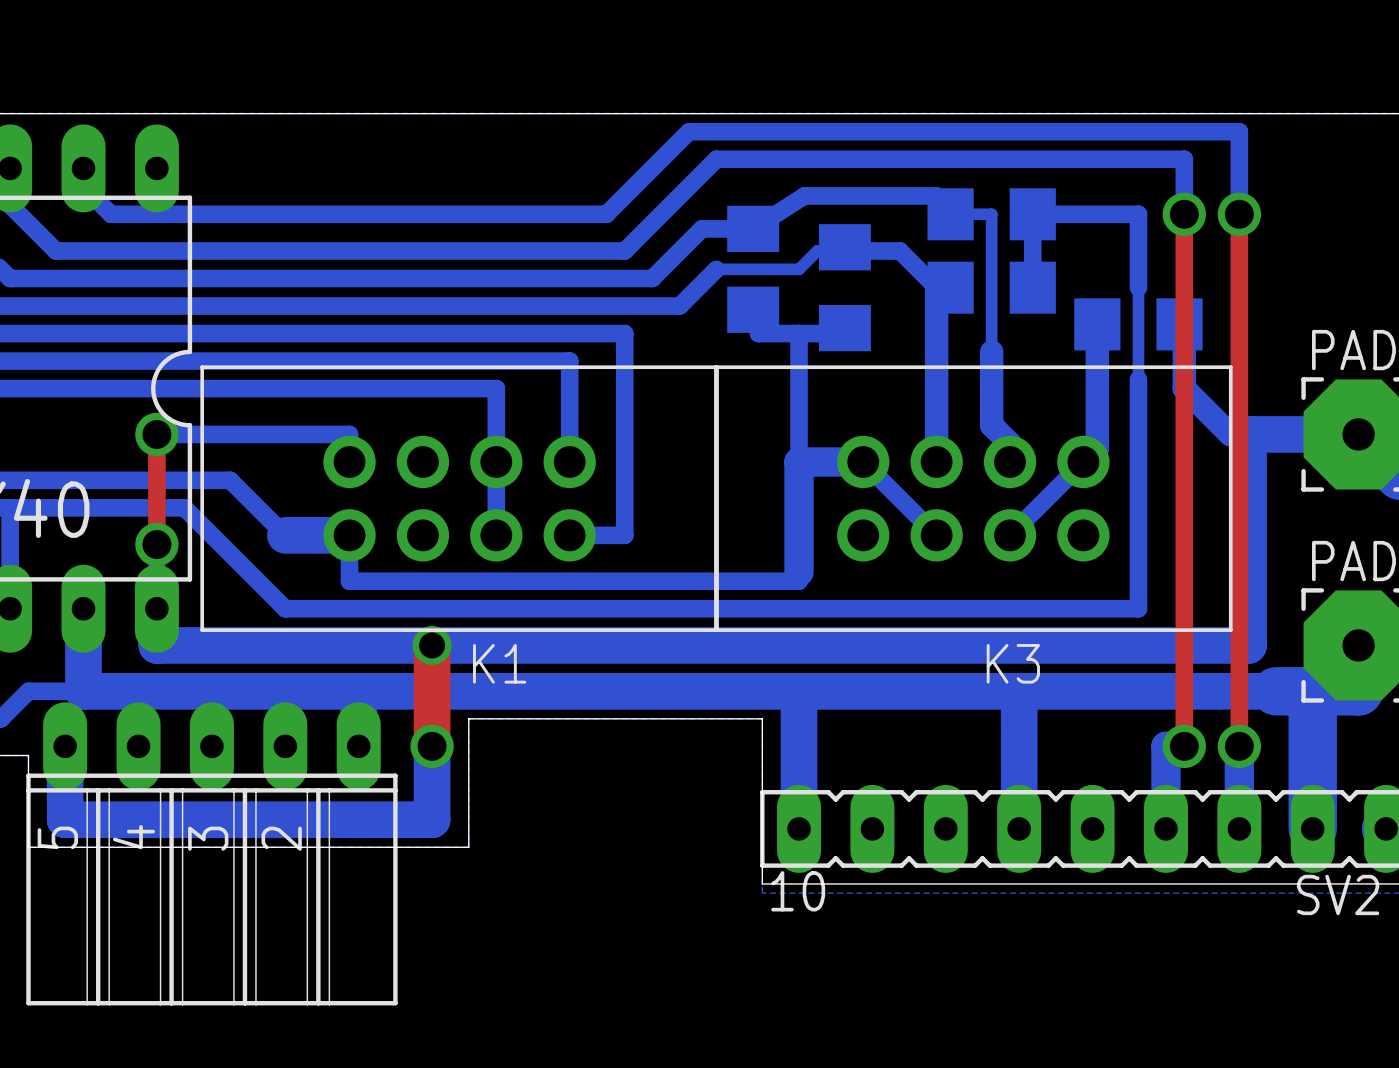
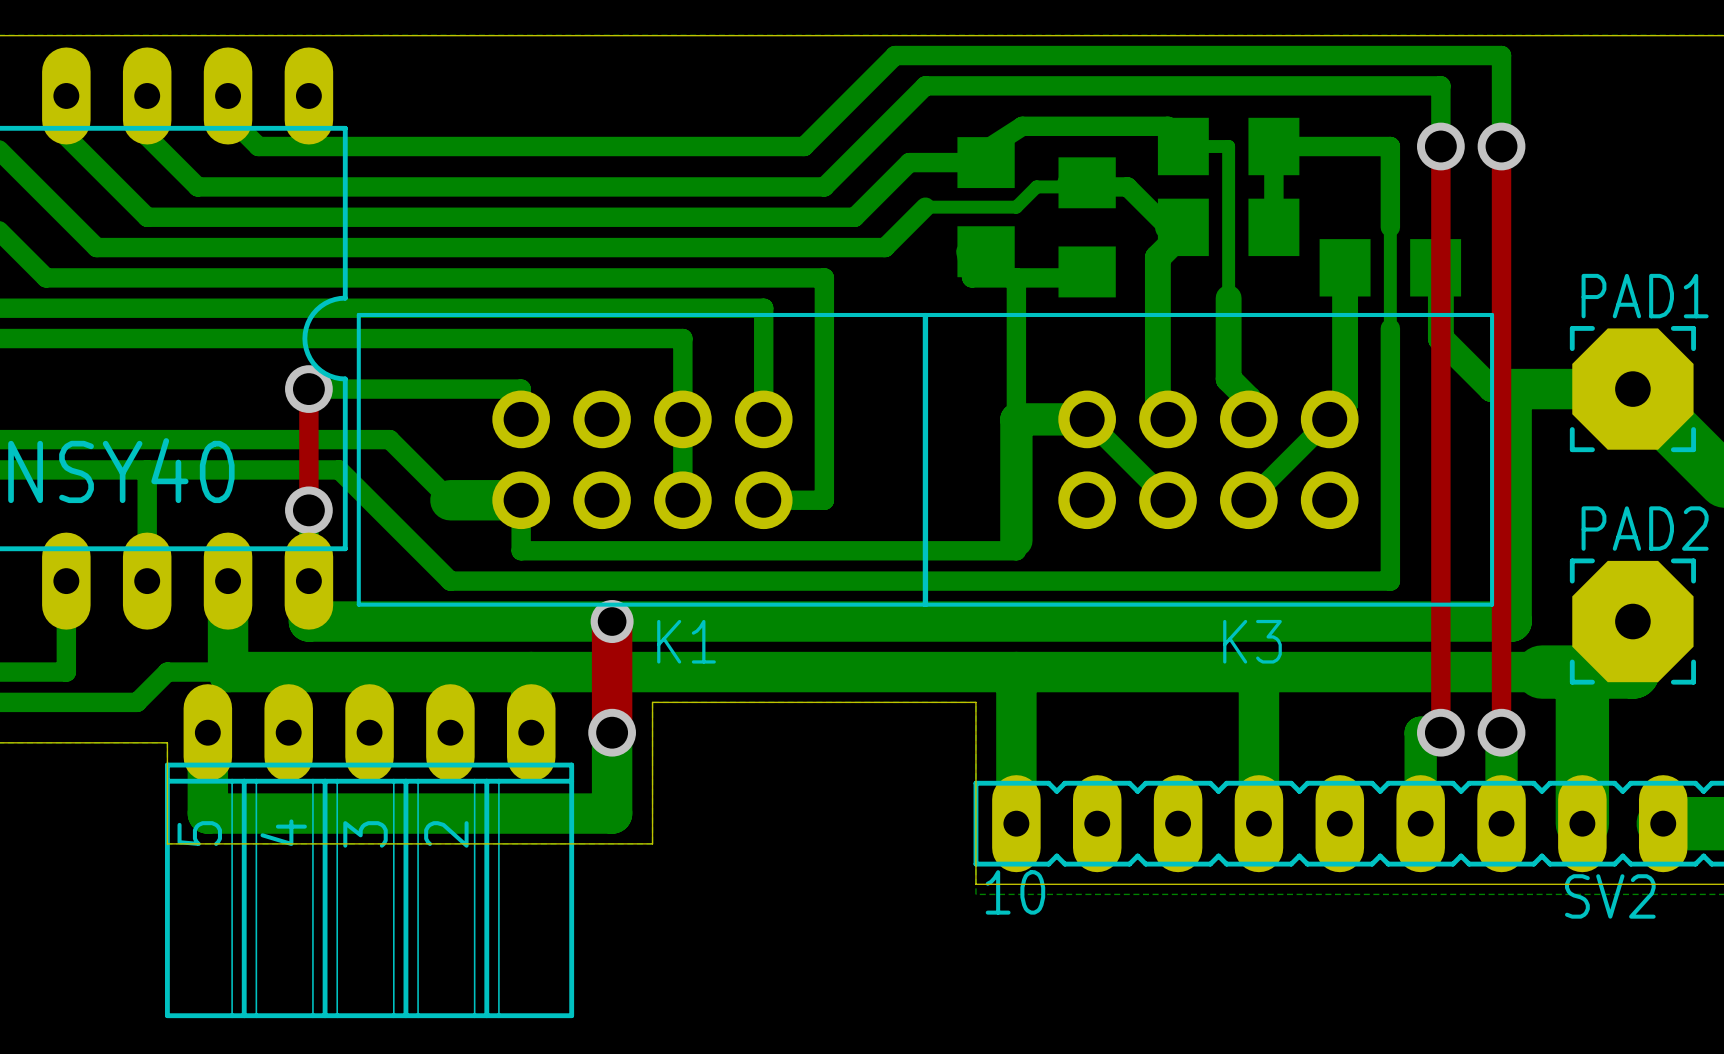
part position: (753, 269) -> (986, 207)
part position: (844, 287) -> (1087, 227)
bottom track: (936, 287) (936, 461) -> (1183, 232) (1157, 257) (1157, 409) (1167, 419)

